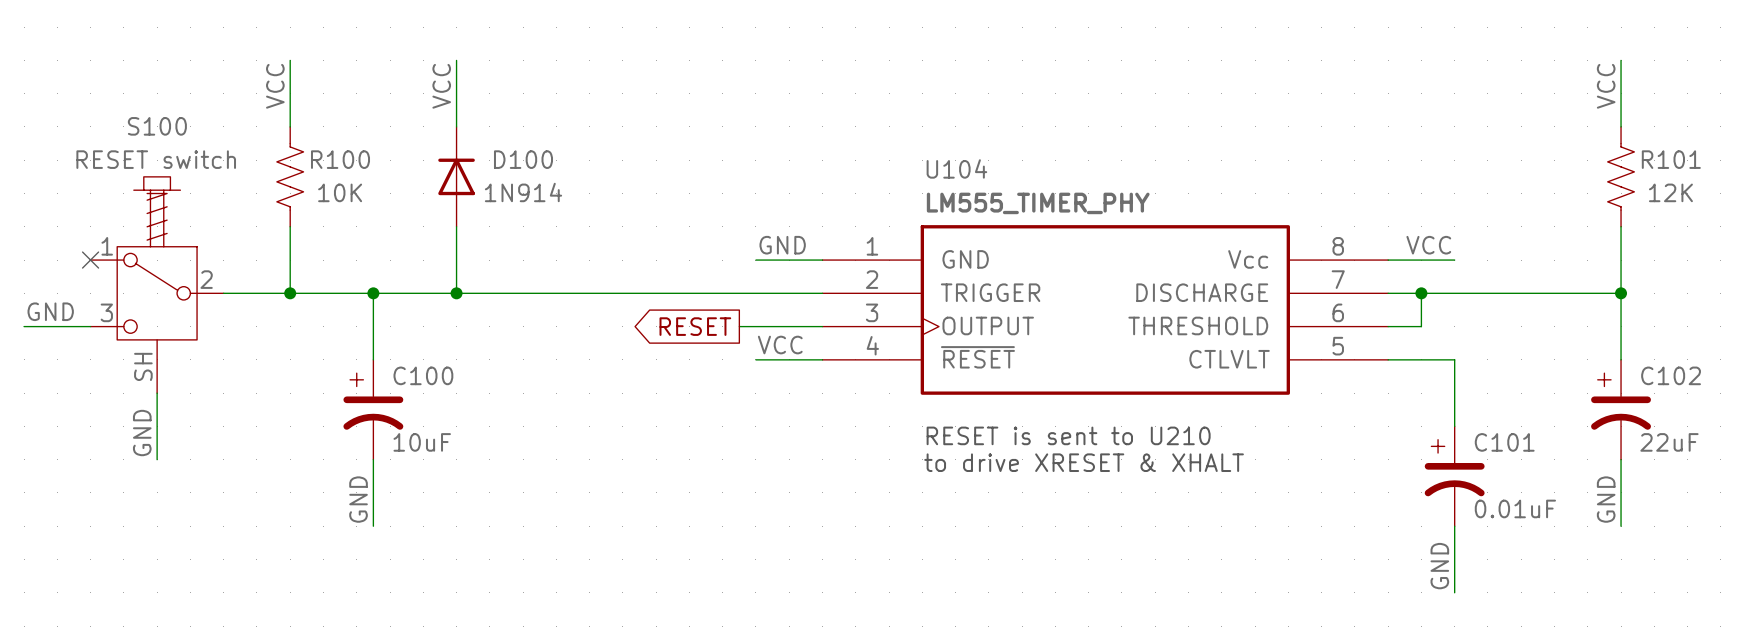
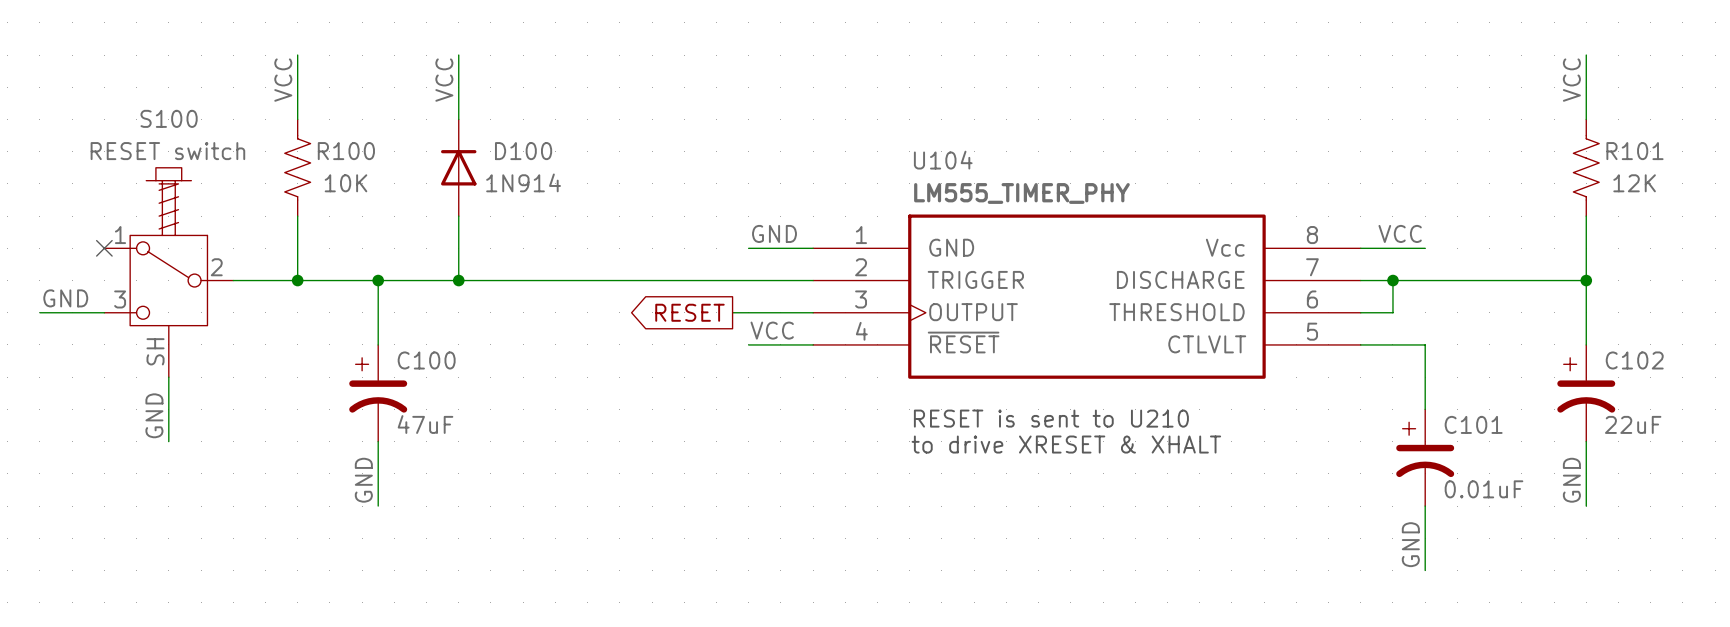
C100 value: 10uF (422, 442) -> 47uF (425, 424)

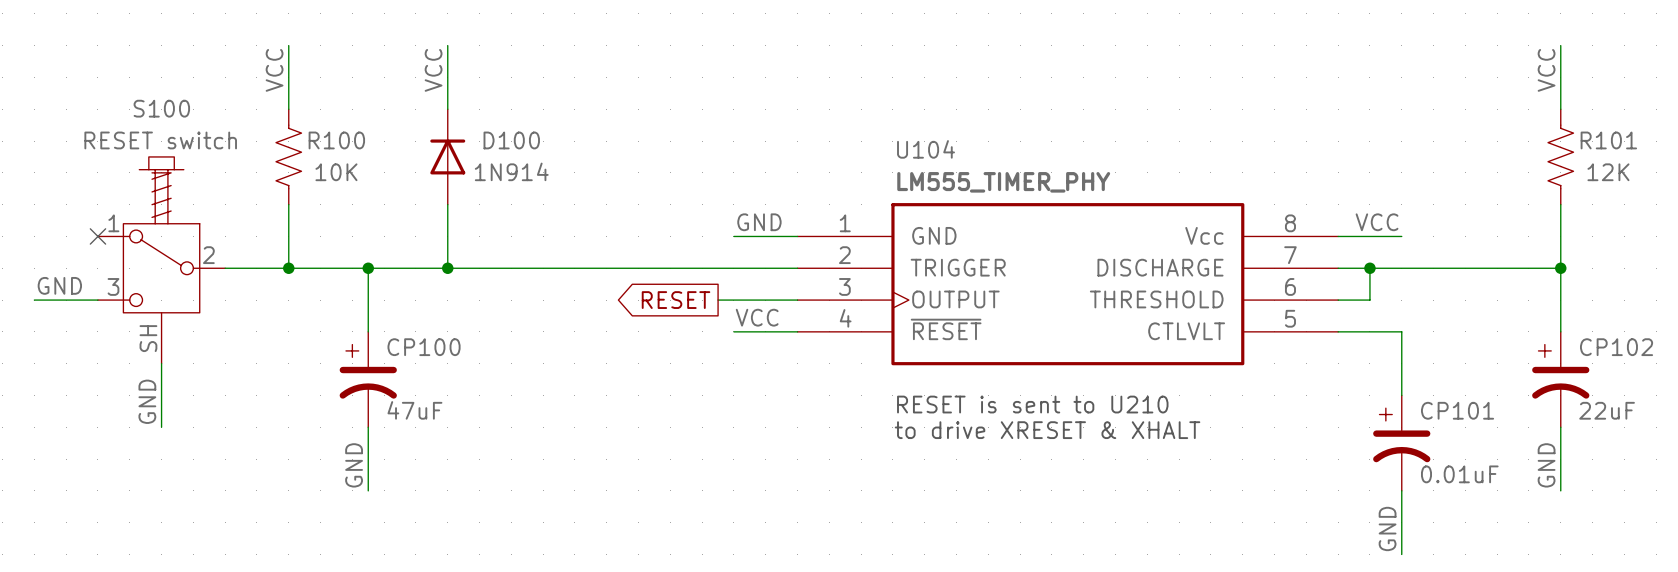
C100 name: C100 (426, 360) -> CP100 (424, 347)
C102 name: C102 (1634, 360) -> CP102 (1616, 347)
C101 name: C101 (1473, 424) -> CP101 (1457, 410)

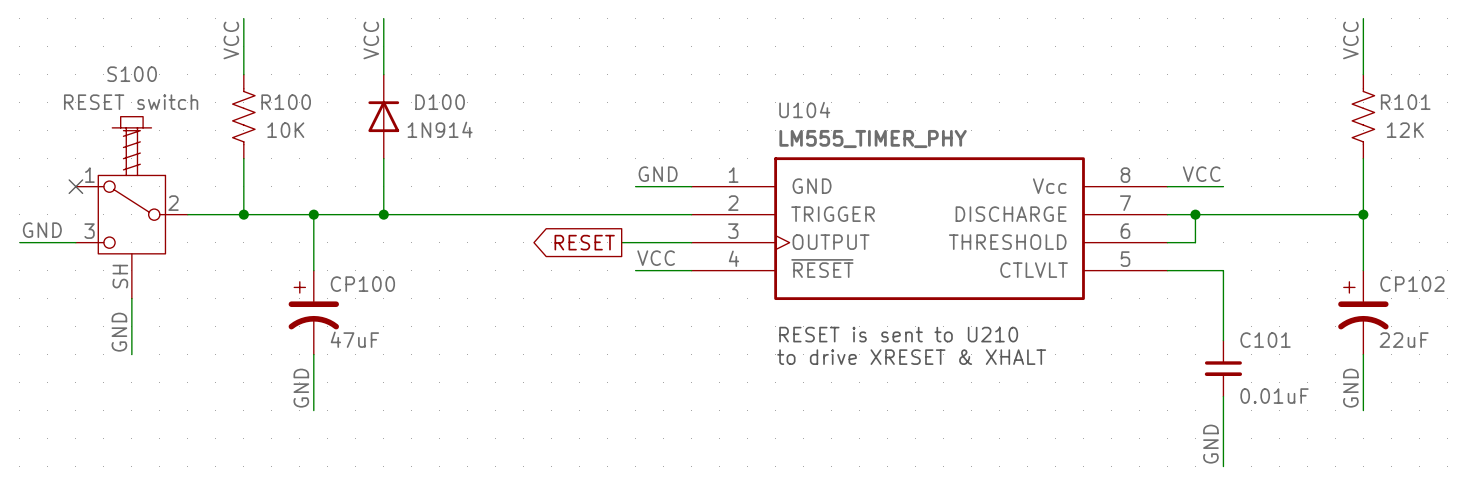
CP101: 0.01uF (1401, 443) -> none
C101: none -> 0.01uF (1223, 368)

